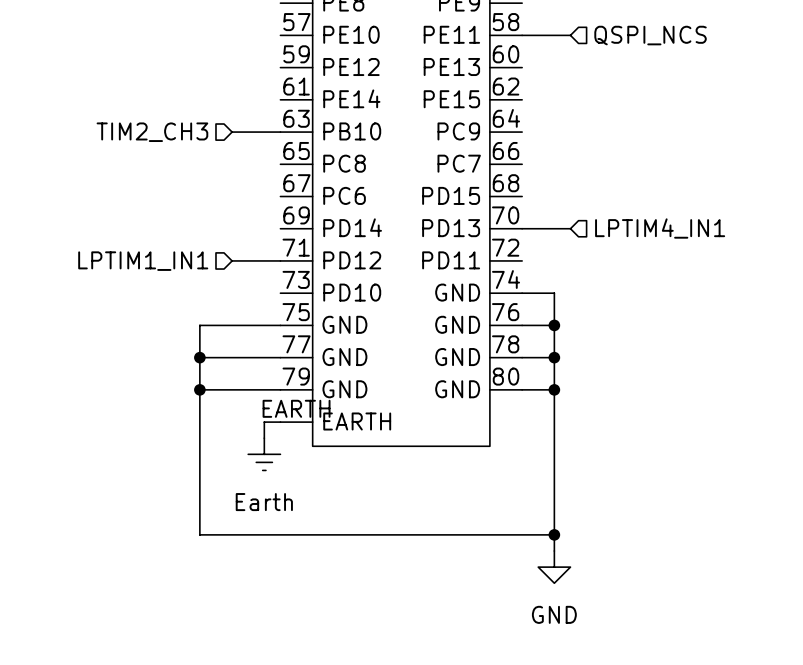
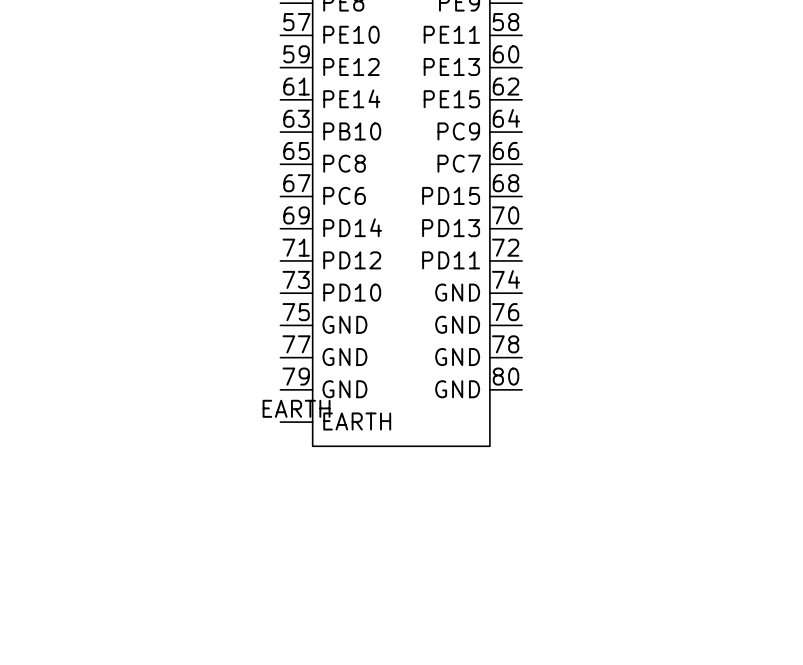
wire: (522, 35) (570, 35) -> none
hierarchical label: QSPI_NCS (650, 35) -> none
hierarchical label: TIM2_CH3 (152, 132) -> none
wire: (232, 132) (280, 132) -> none
wire: (522, 228) (570, 228) -> none
hierarchical label: LPTIM4_IN1 (660, 228) -> none
wire: (232, 260) (280, 260) -> none
hierarchical label: LPTIM1_IN1 (143, 261) -> none
wire: (522, 293) (554, 293) (554, 551) -> none
wire: (280, 325) (199, 325) (199, 534) (554, 534) -> none
wire: (522, 325) (554, 325) -> none
junction: (554, 325) -> none
wire: (199, 357) (280, 357) -> none
junction: (199, 357) -> none
wire: (522, 357) (554, 357) -> none
junction: (554, 357) -> none
wire: (199, 389) (280, 389) -> none
junction: (199, 389) -> none
wire: (522, 389) (554, 389) -> none
junction: (554, 389) -> none
wire: (280, 422) (264, 422) (264, 438) -> none
power symbol: Earth (264, 454) -> none
junction: (554, 534) -> none
power symbol: GND (554, 567) -> none

